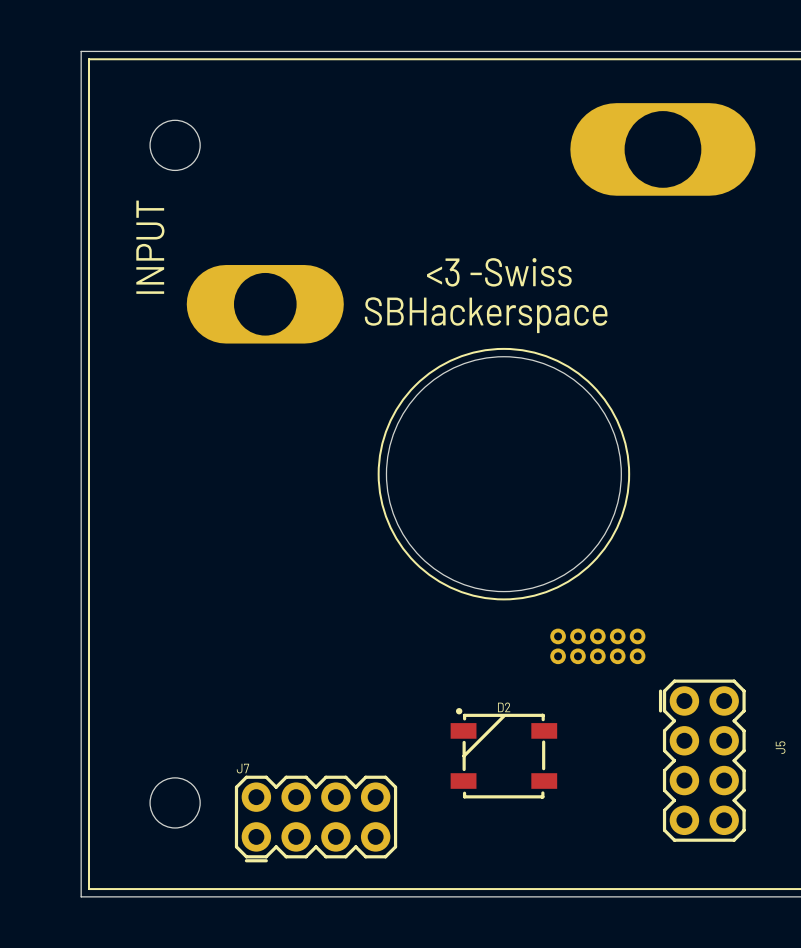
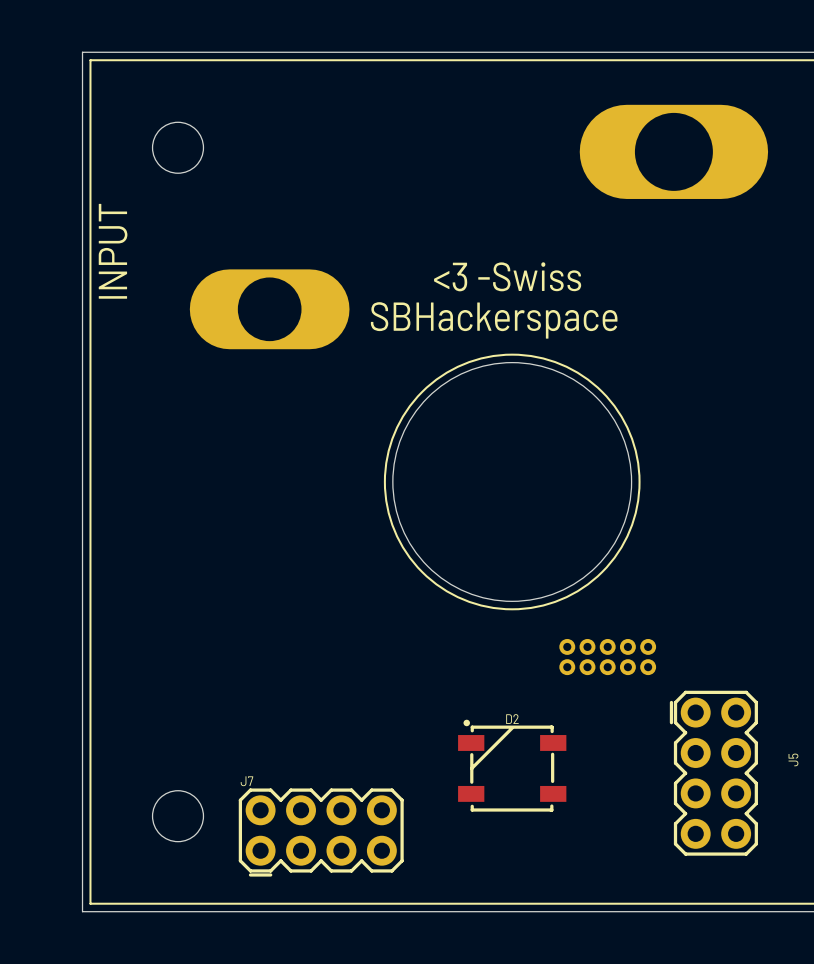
text position: INPUT (150, 247) -> INPUT (113, 251)

